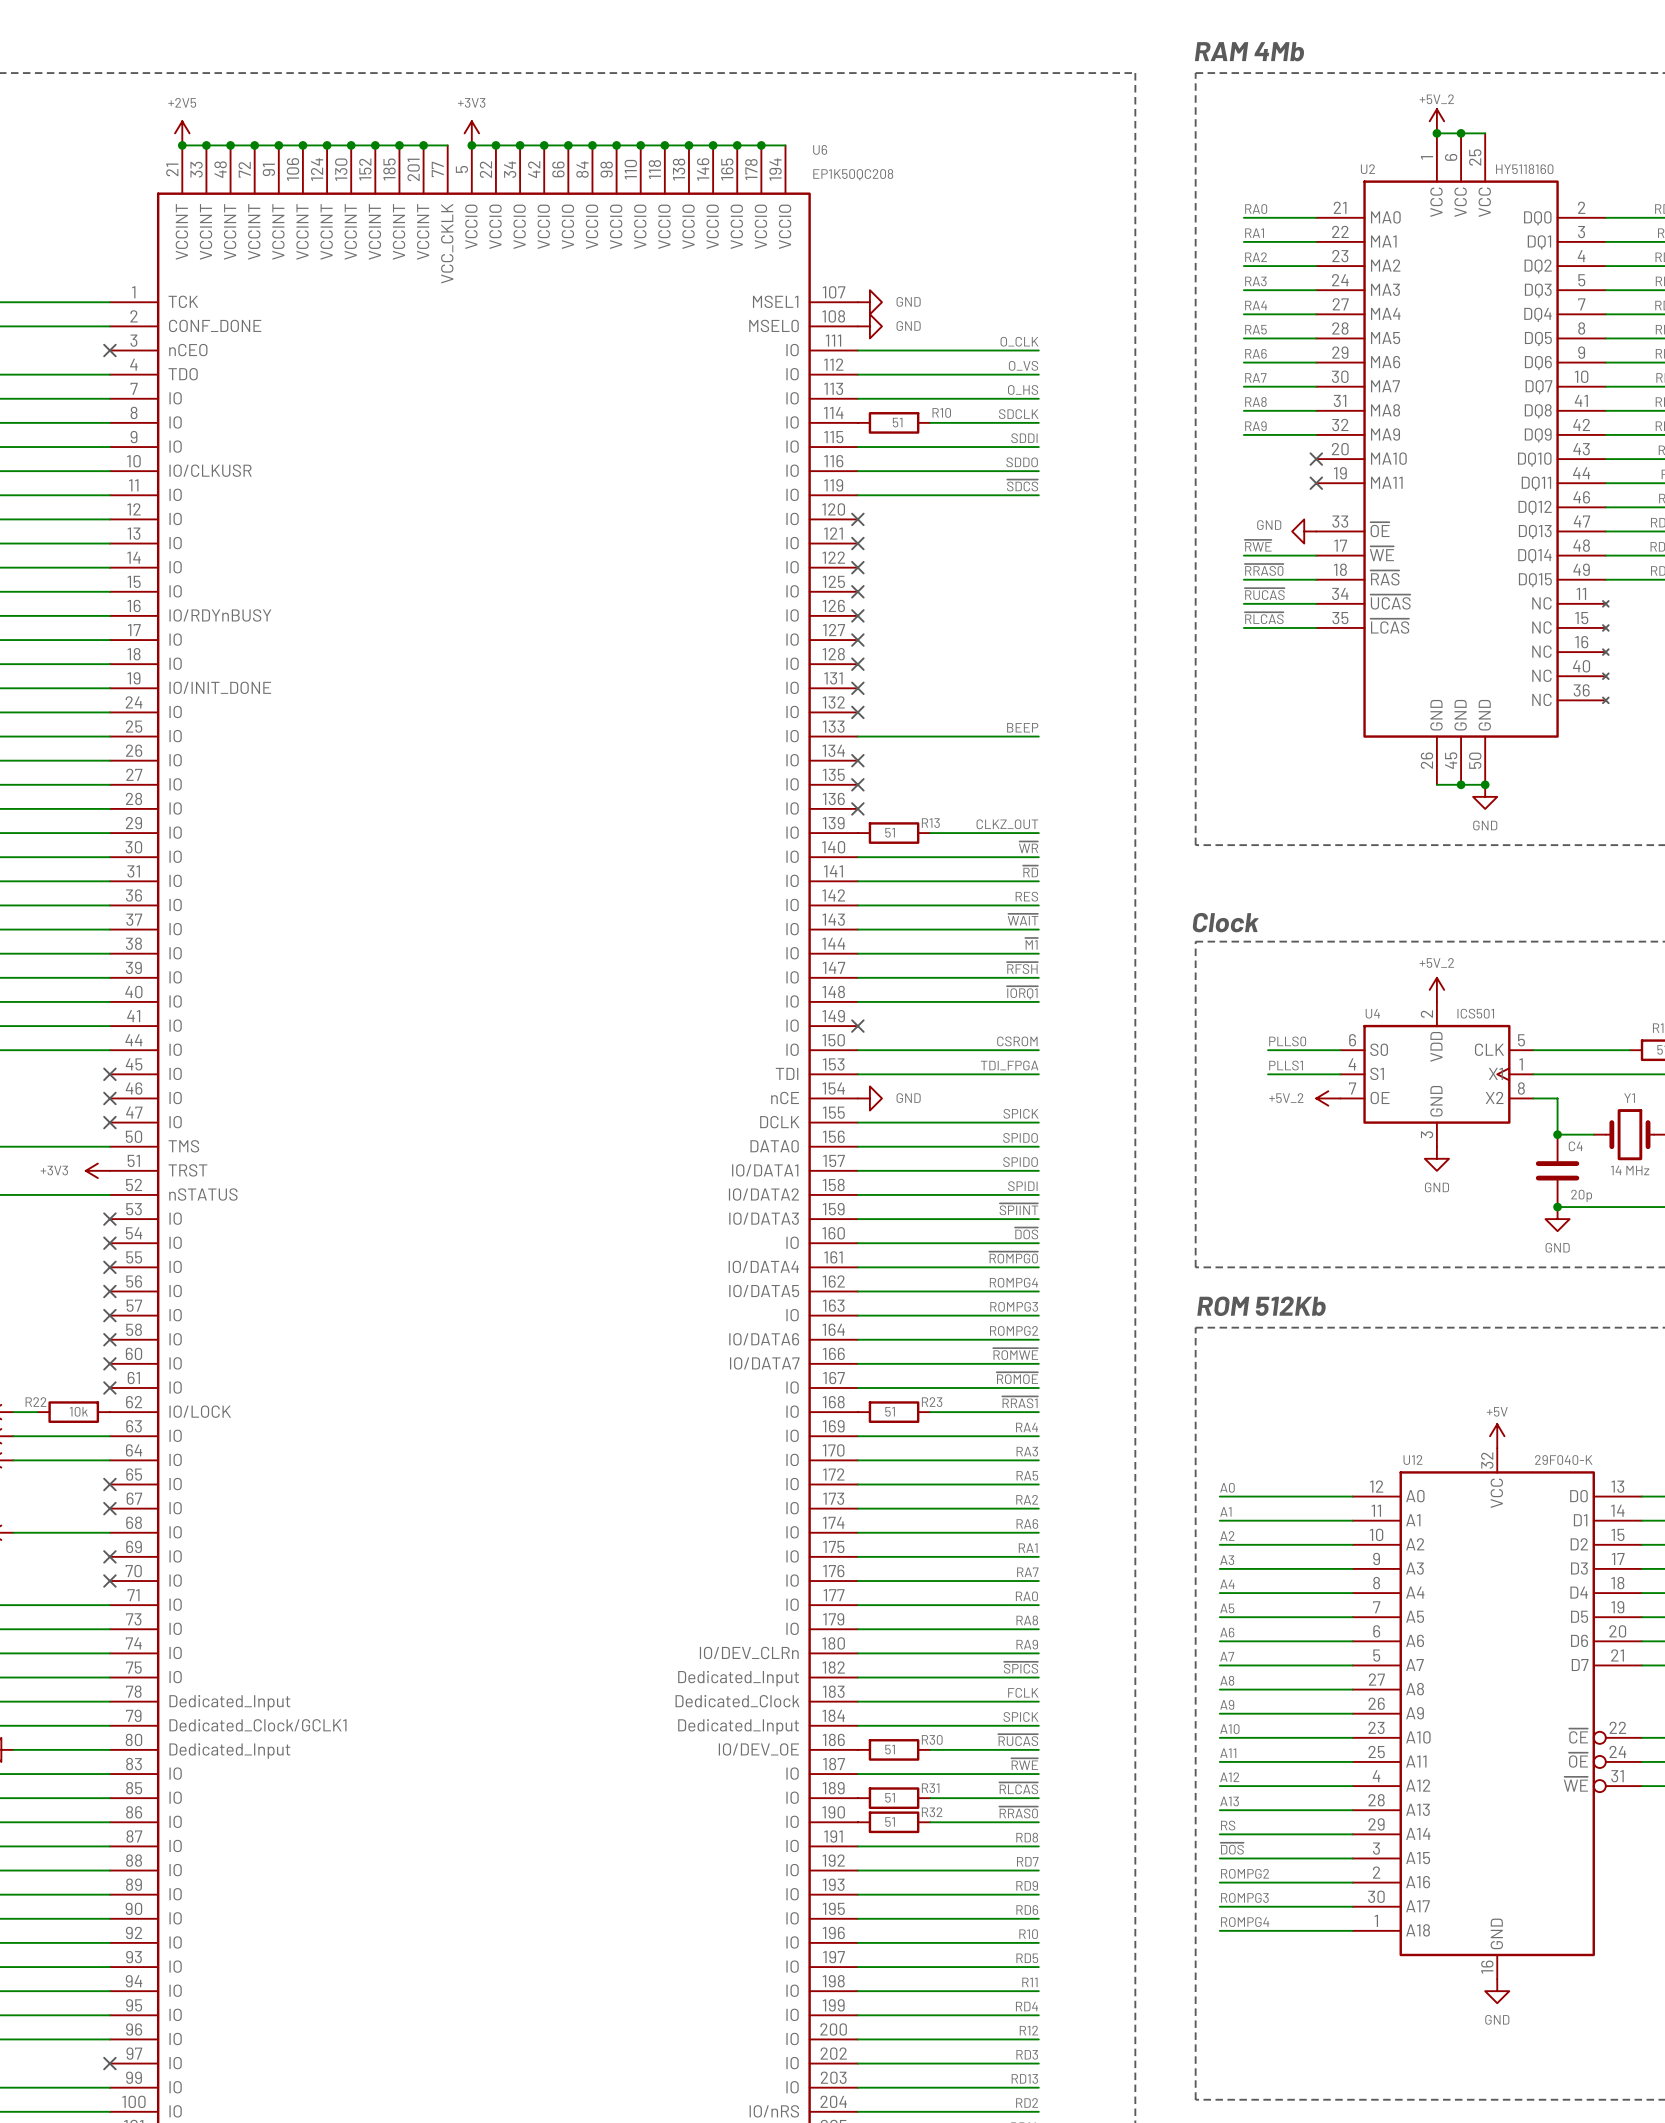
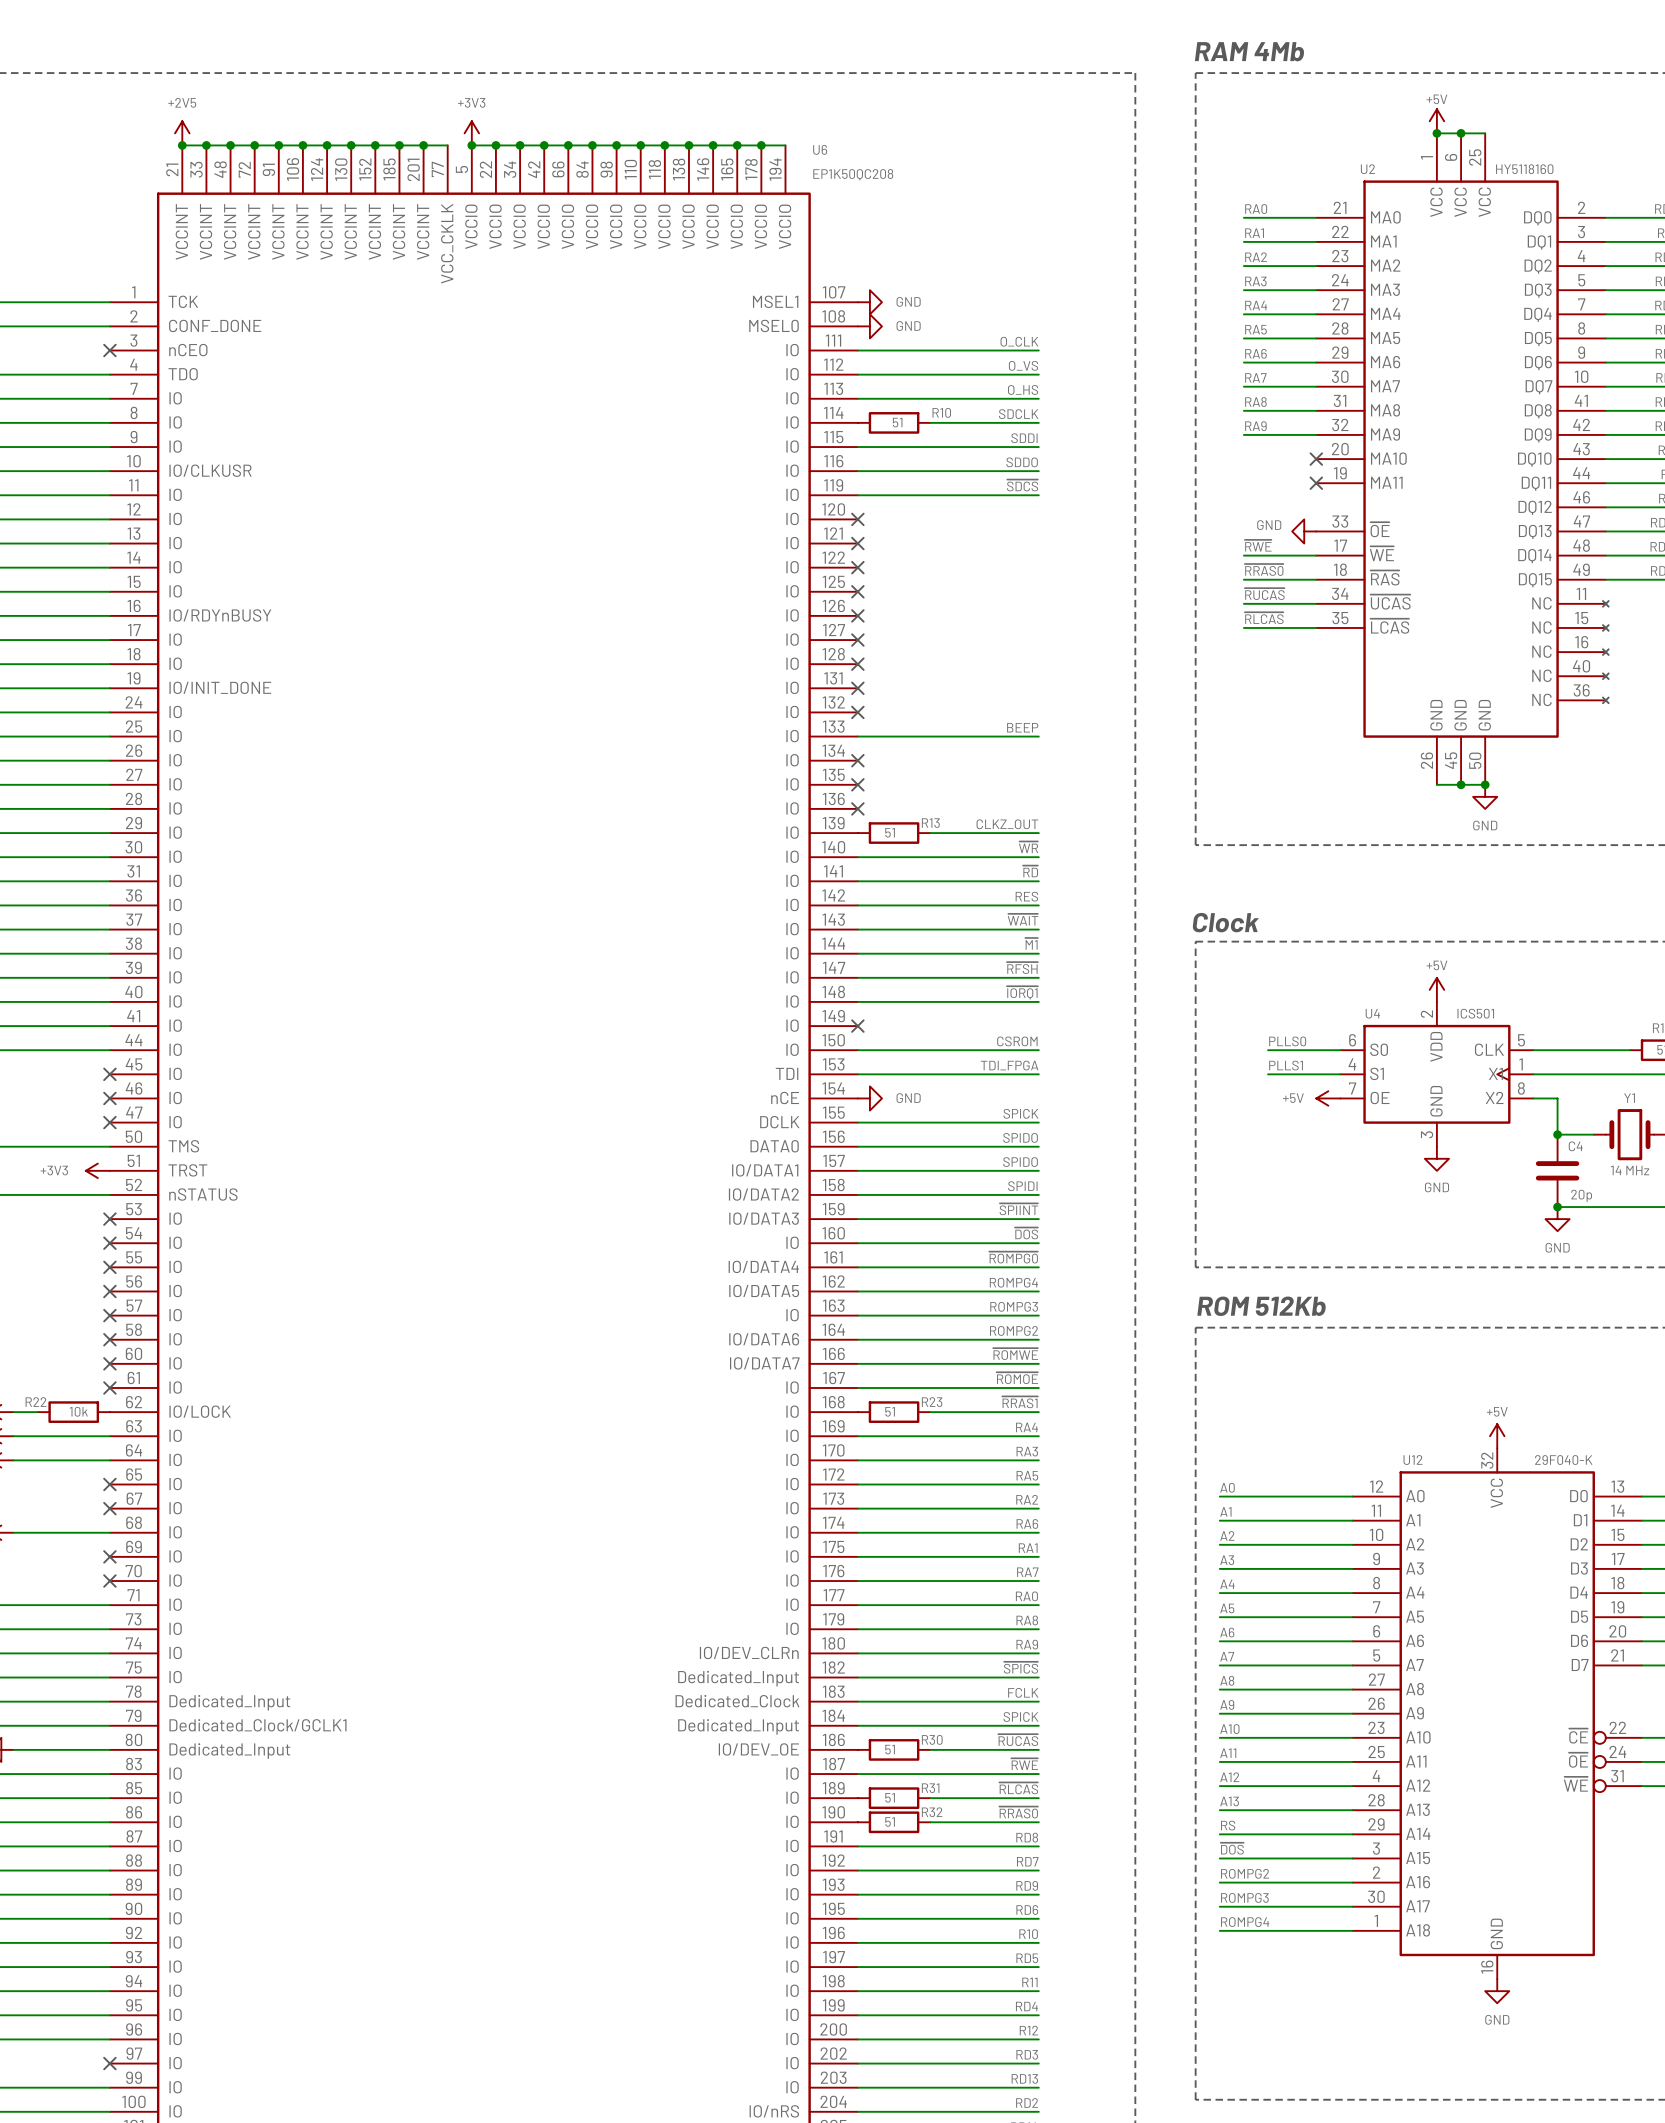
power symbol: +5V_2 (1436, 121) -> +5V (1436, 121)
power symbol: +5V_2 (1436, 989) -> +5V (1436, 989)
power symbol: +5V_2 (1328, 1098) -> +5V (1328, 1098)

